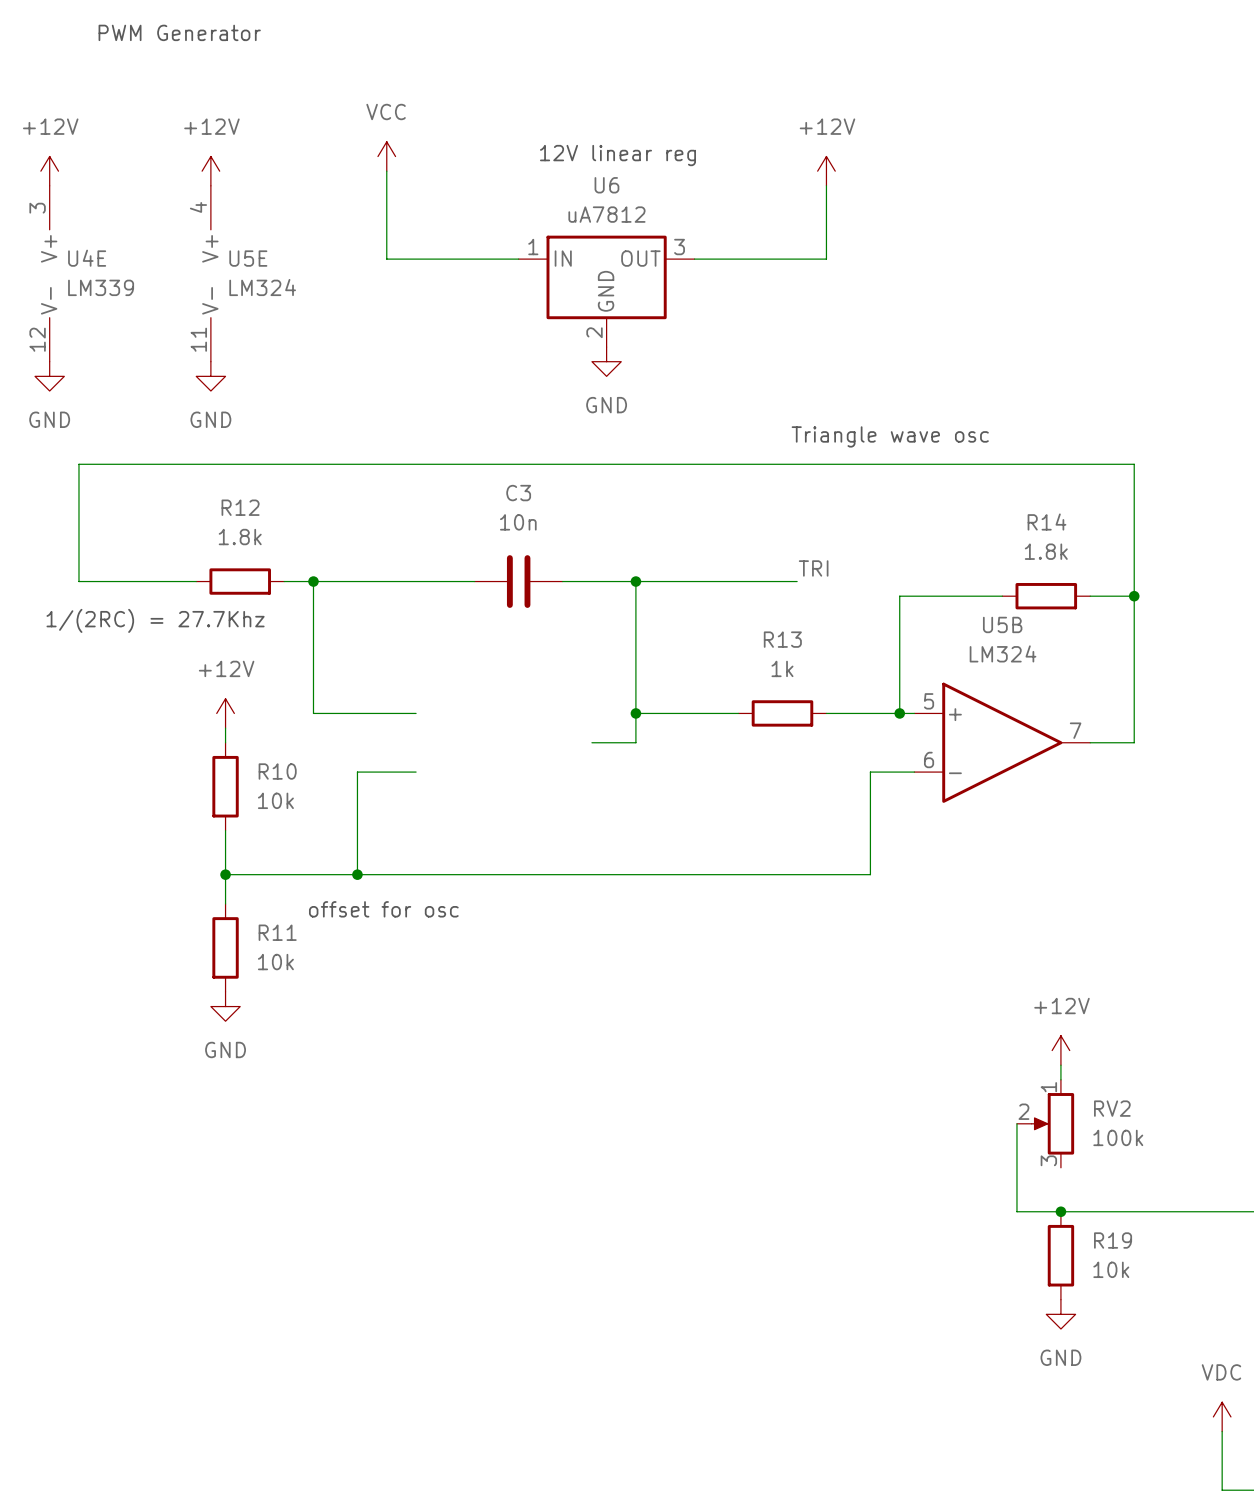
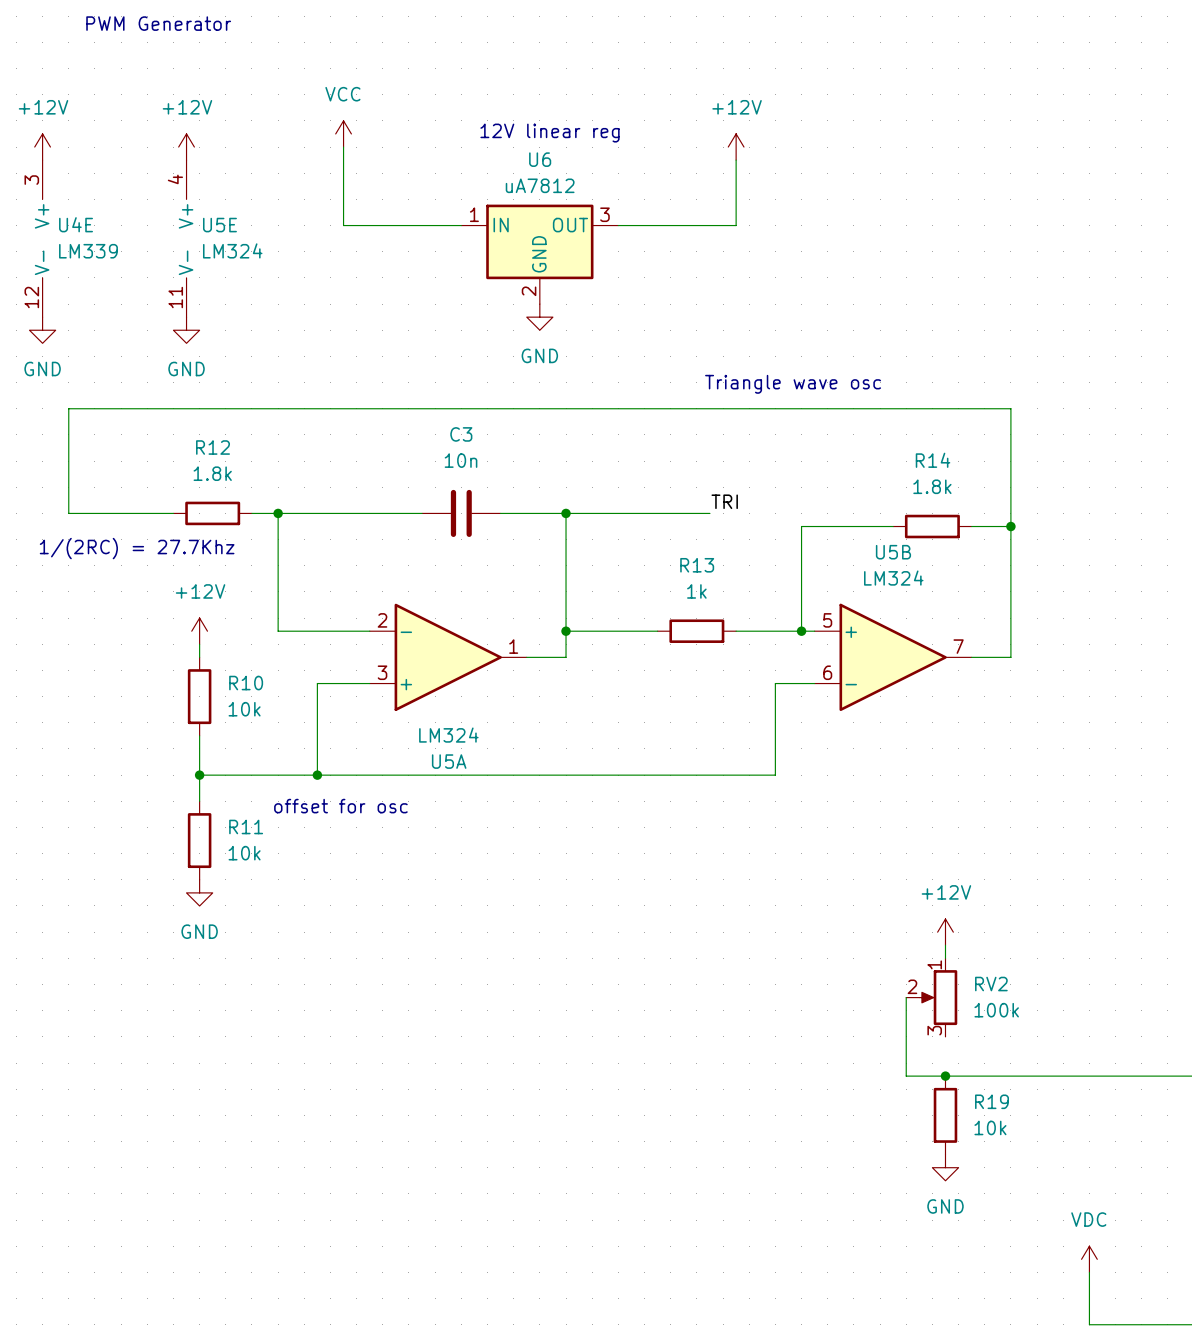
U5A: none -> LM324 (448, 657)

